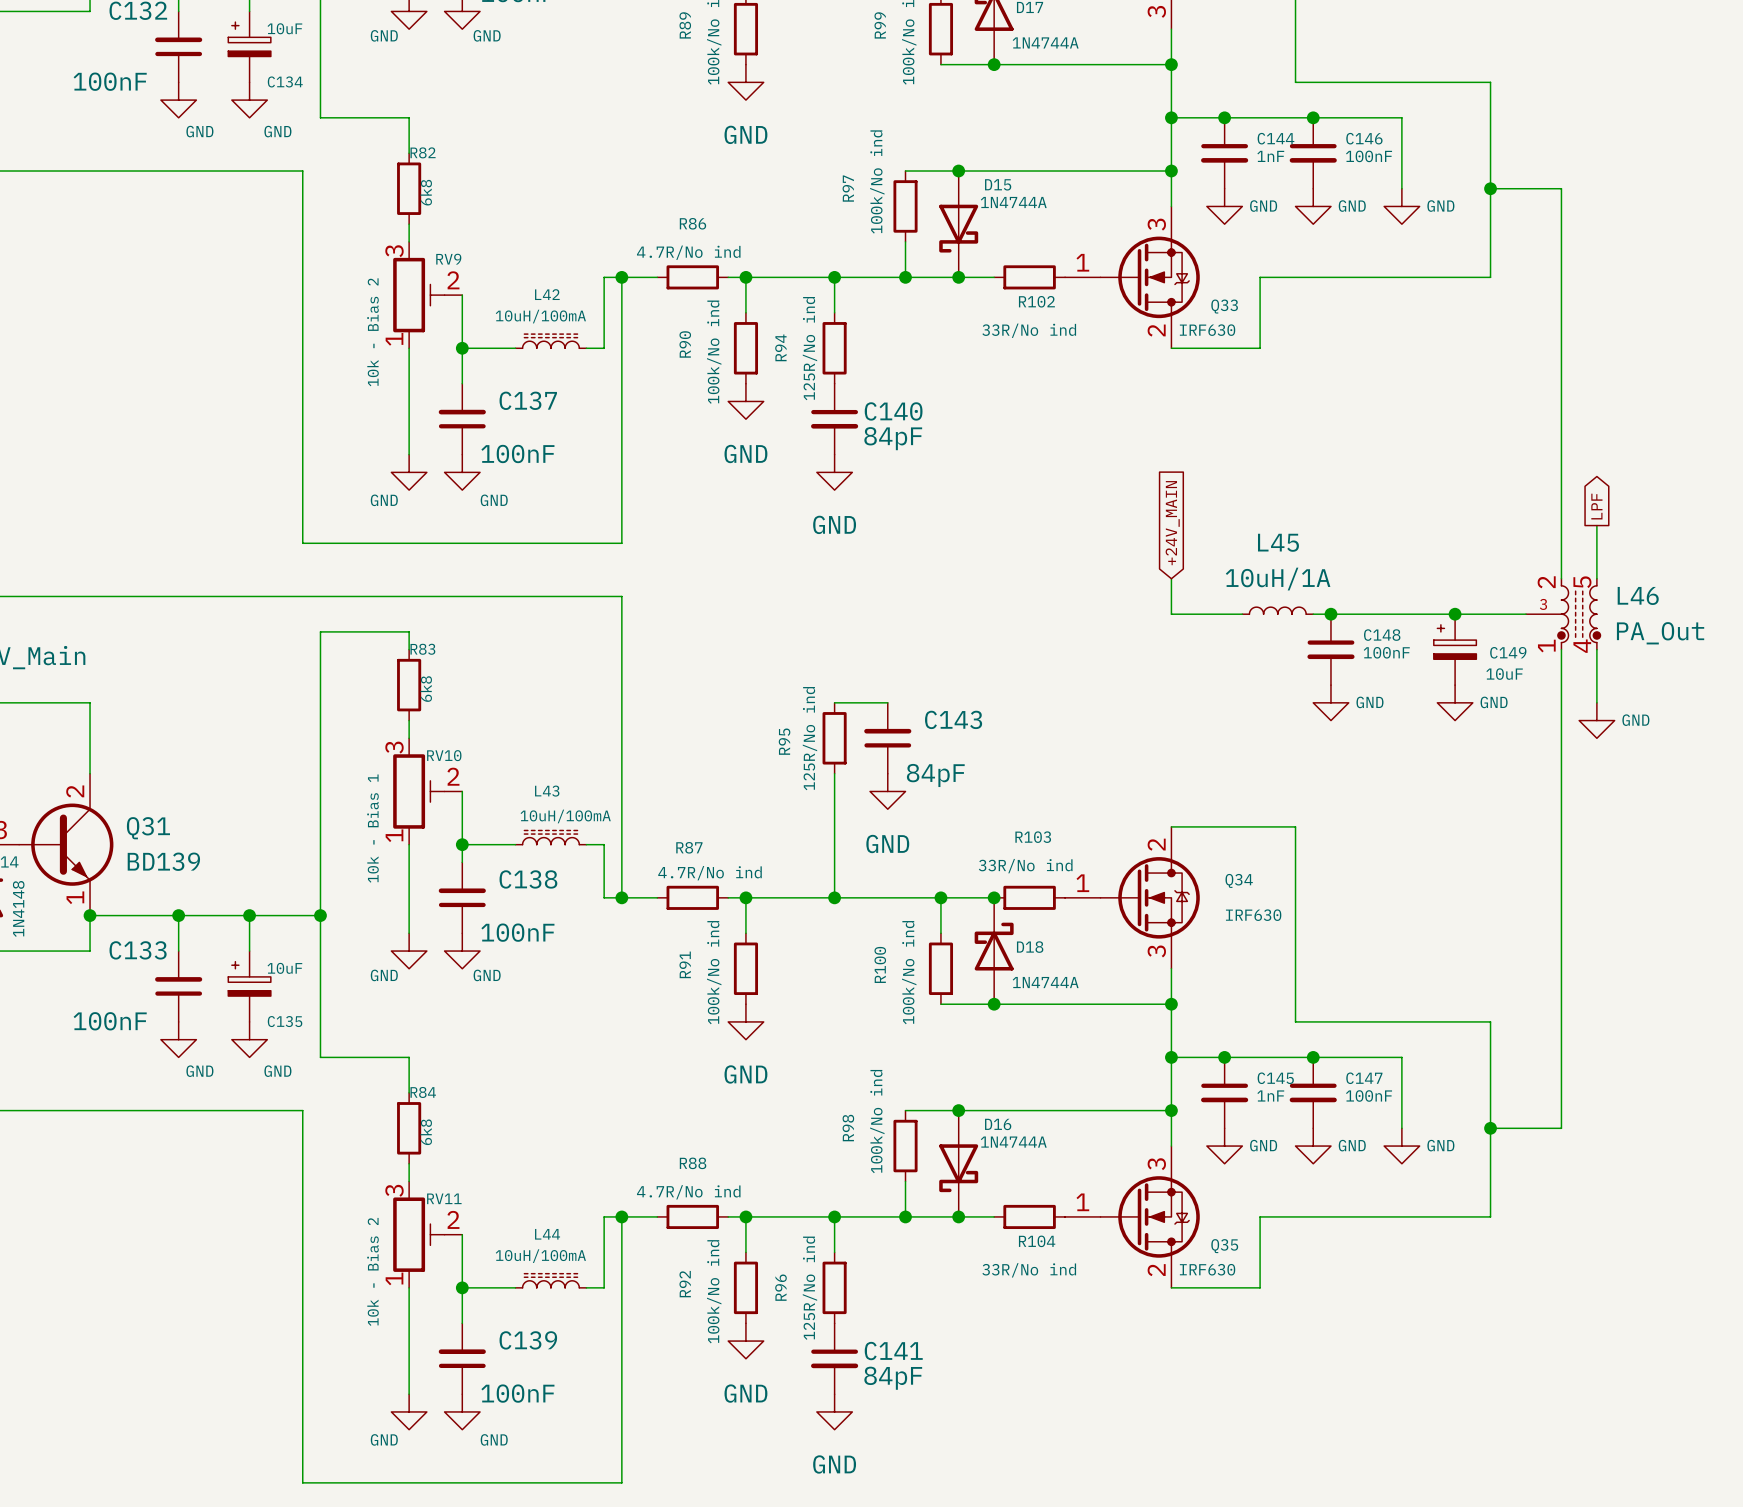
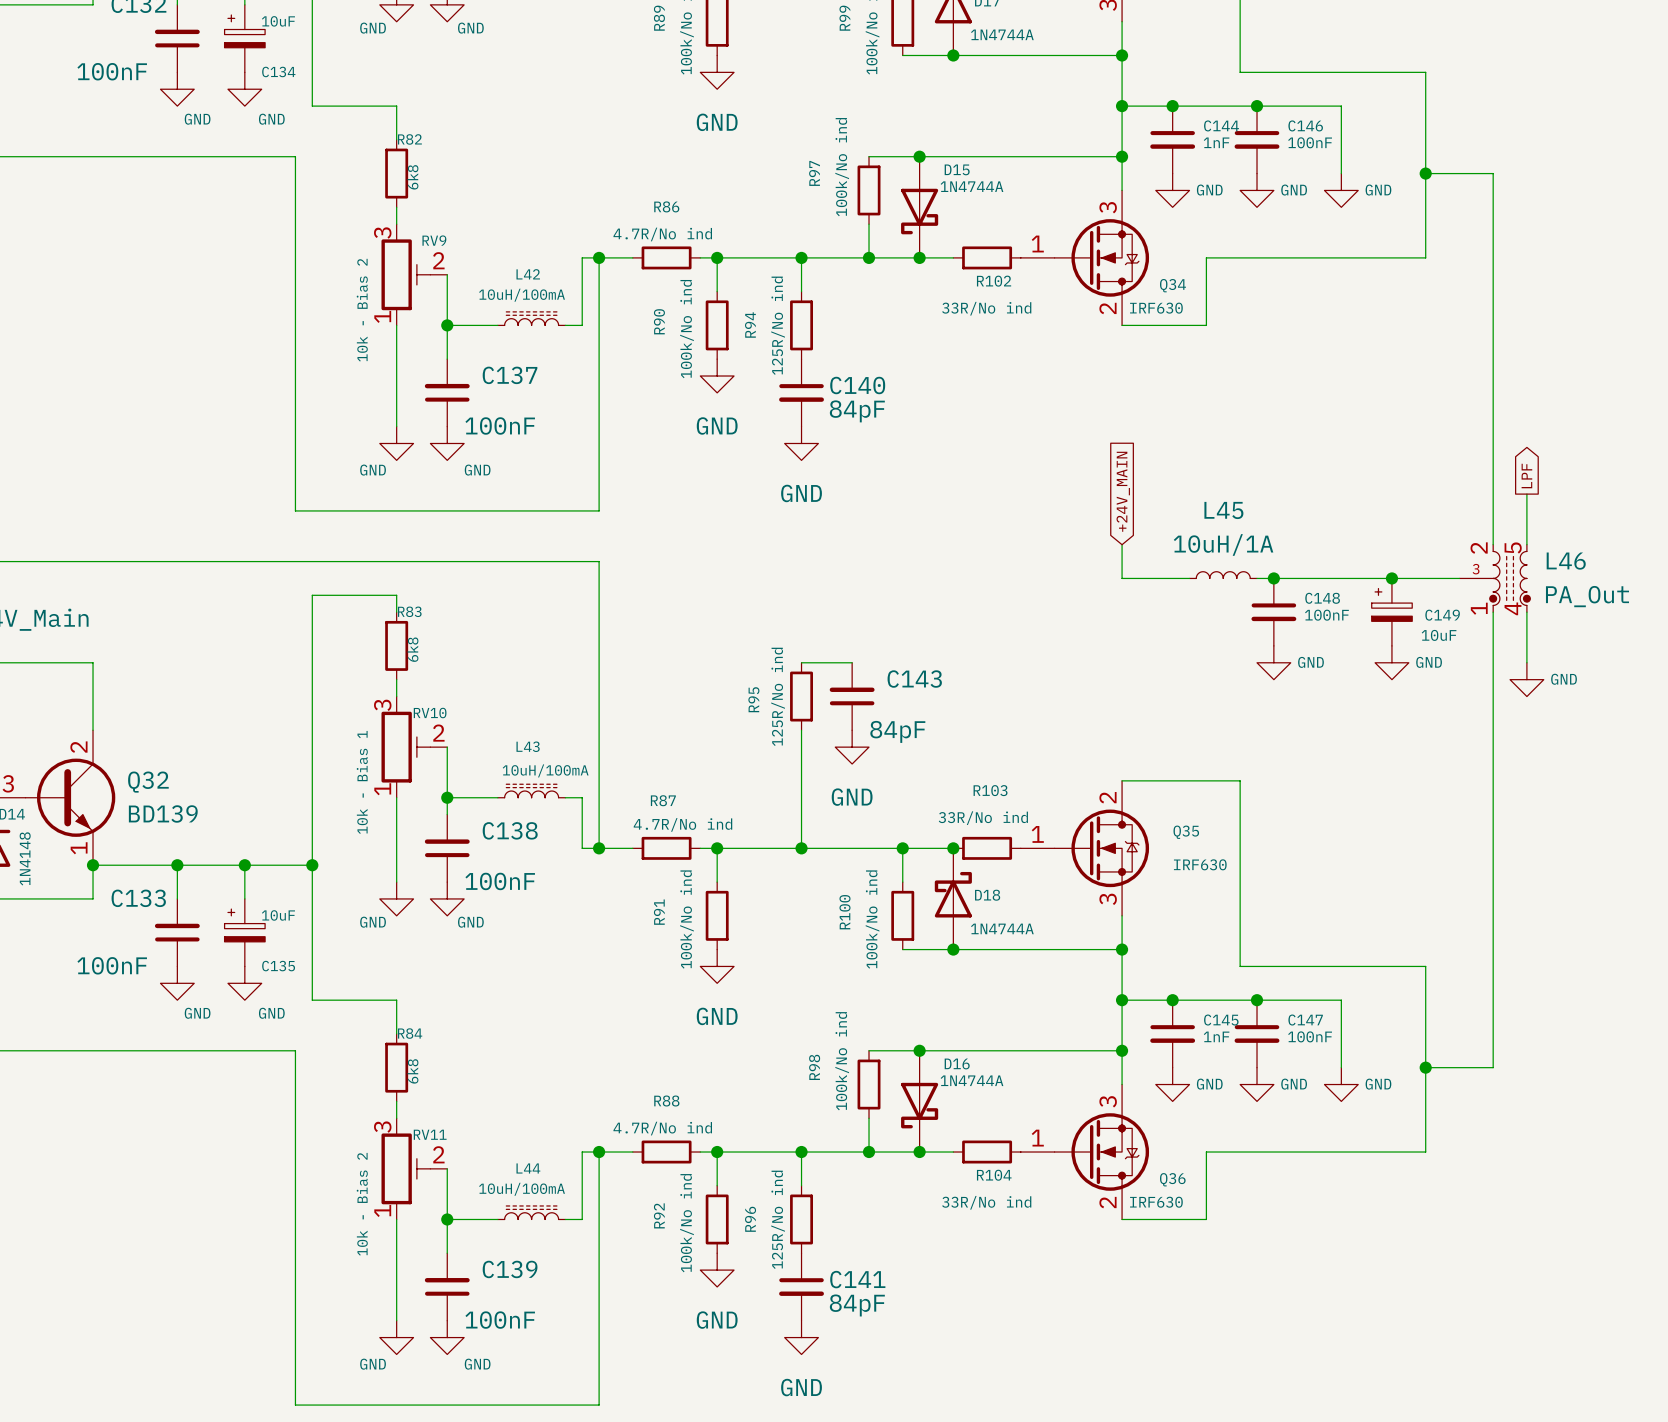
Q33 name: Q33 (1224, 306) -> Q34 (1173, 285)
Q31 name: Q31 (148, 828) -> Q32 (148, 782)
Q34 name: Q34 (1239, 880) -> Q35 (1186, 832)
Q35 name: Q35 (1224, 1246) -> Q36 (1172, 1179)

